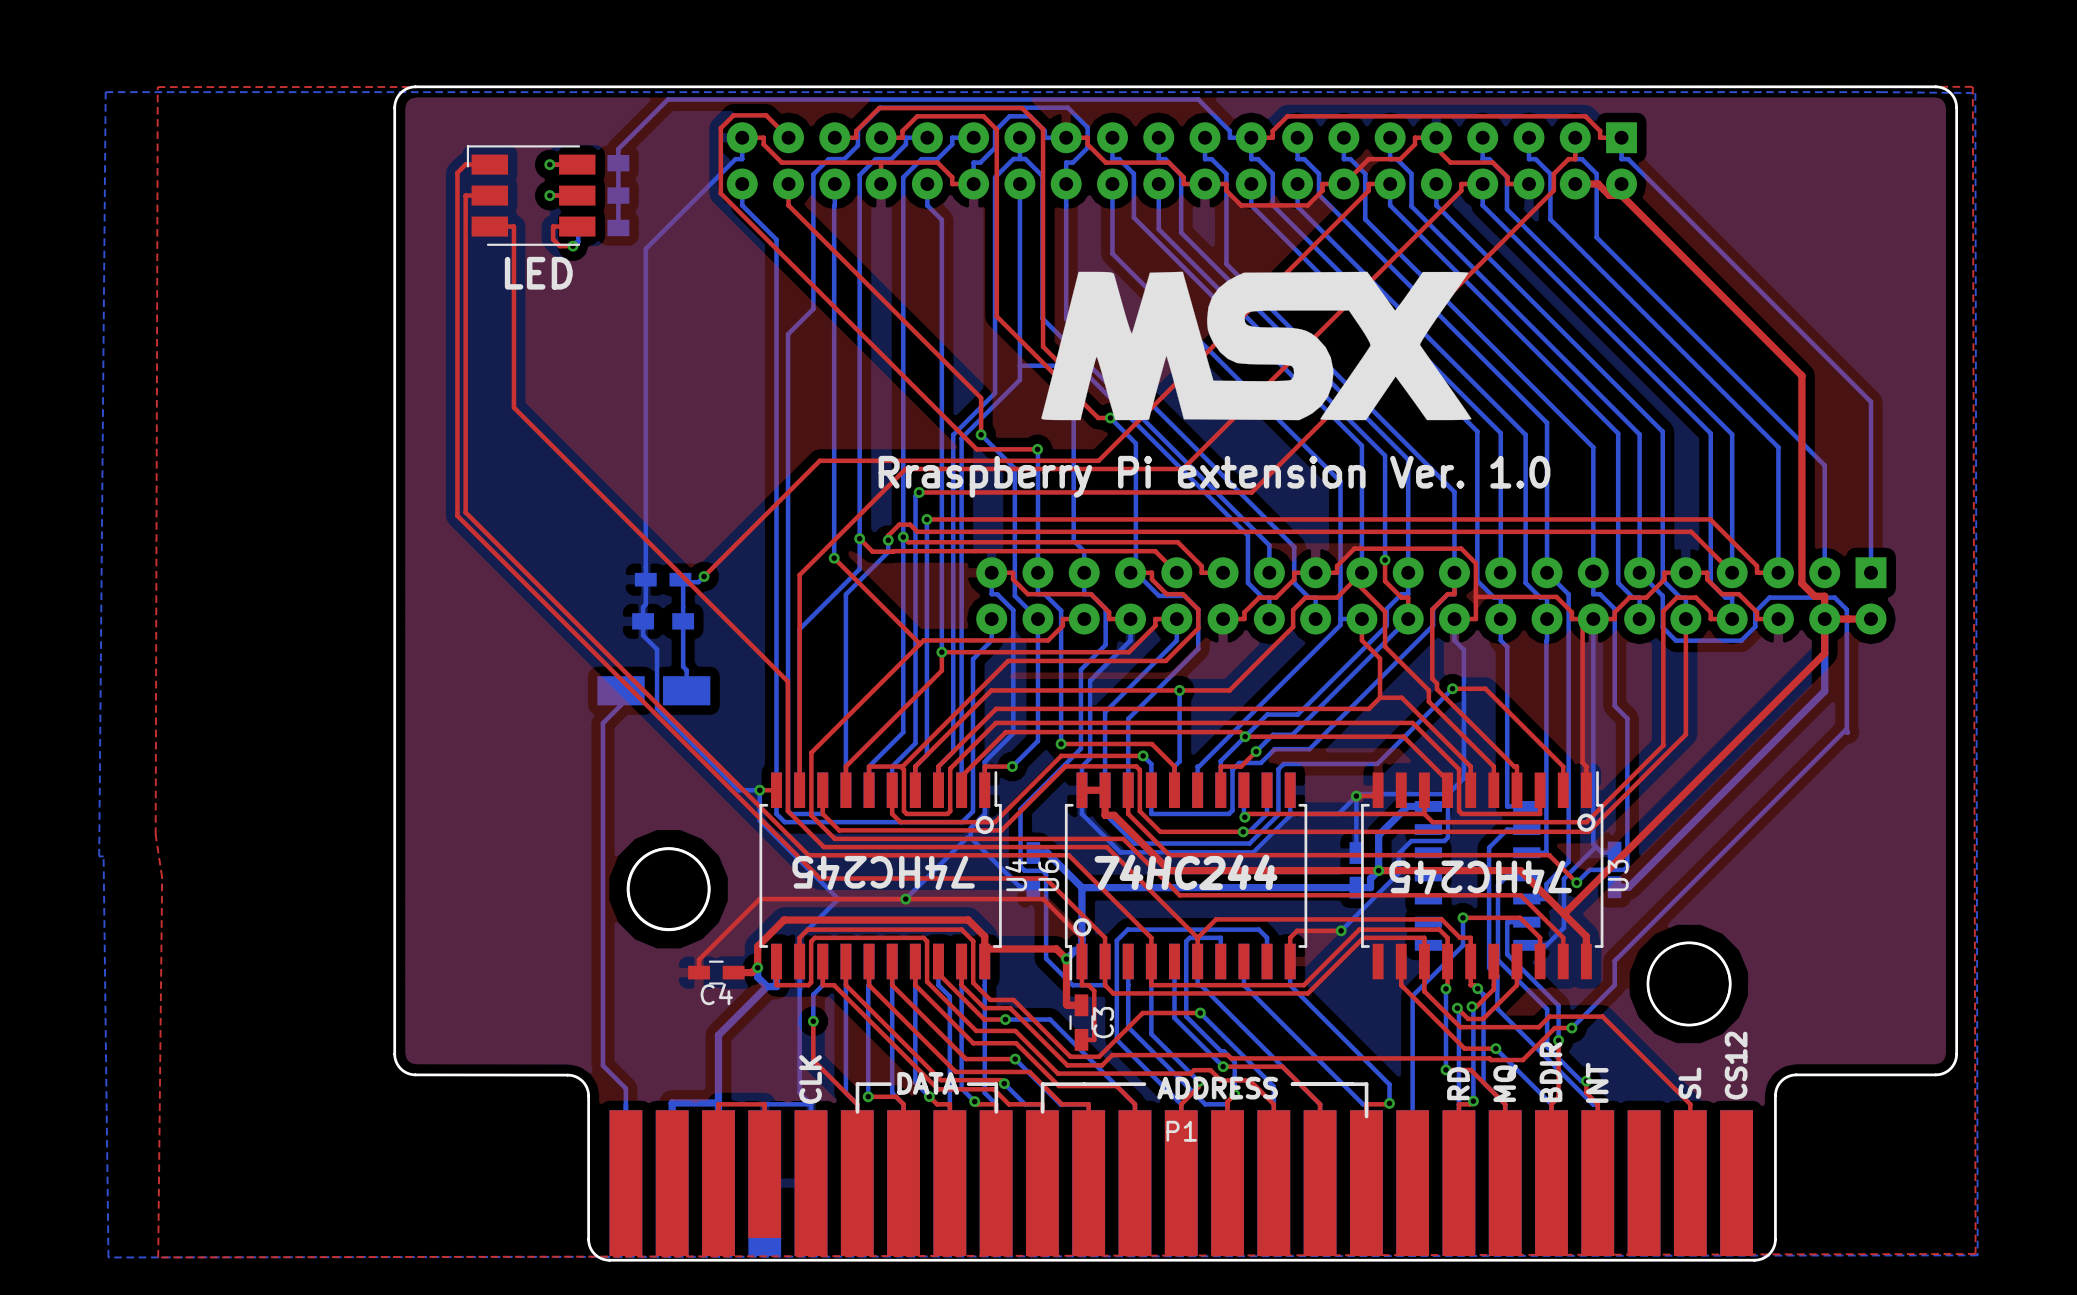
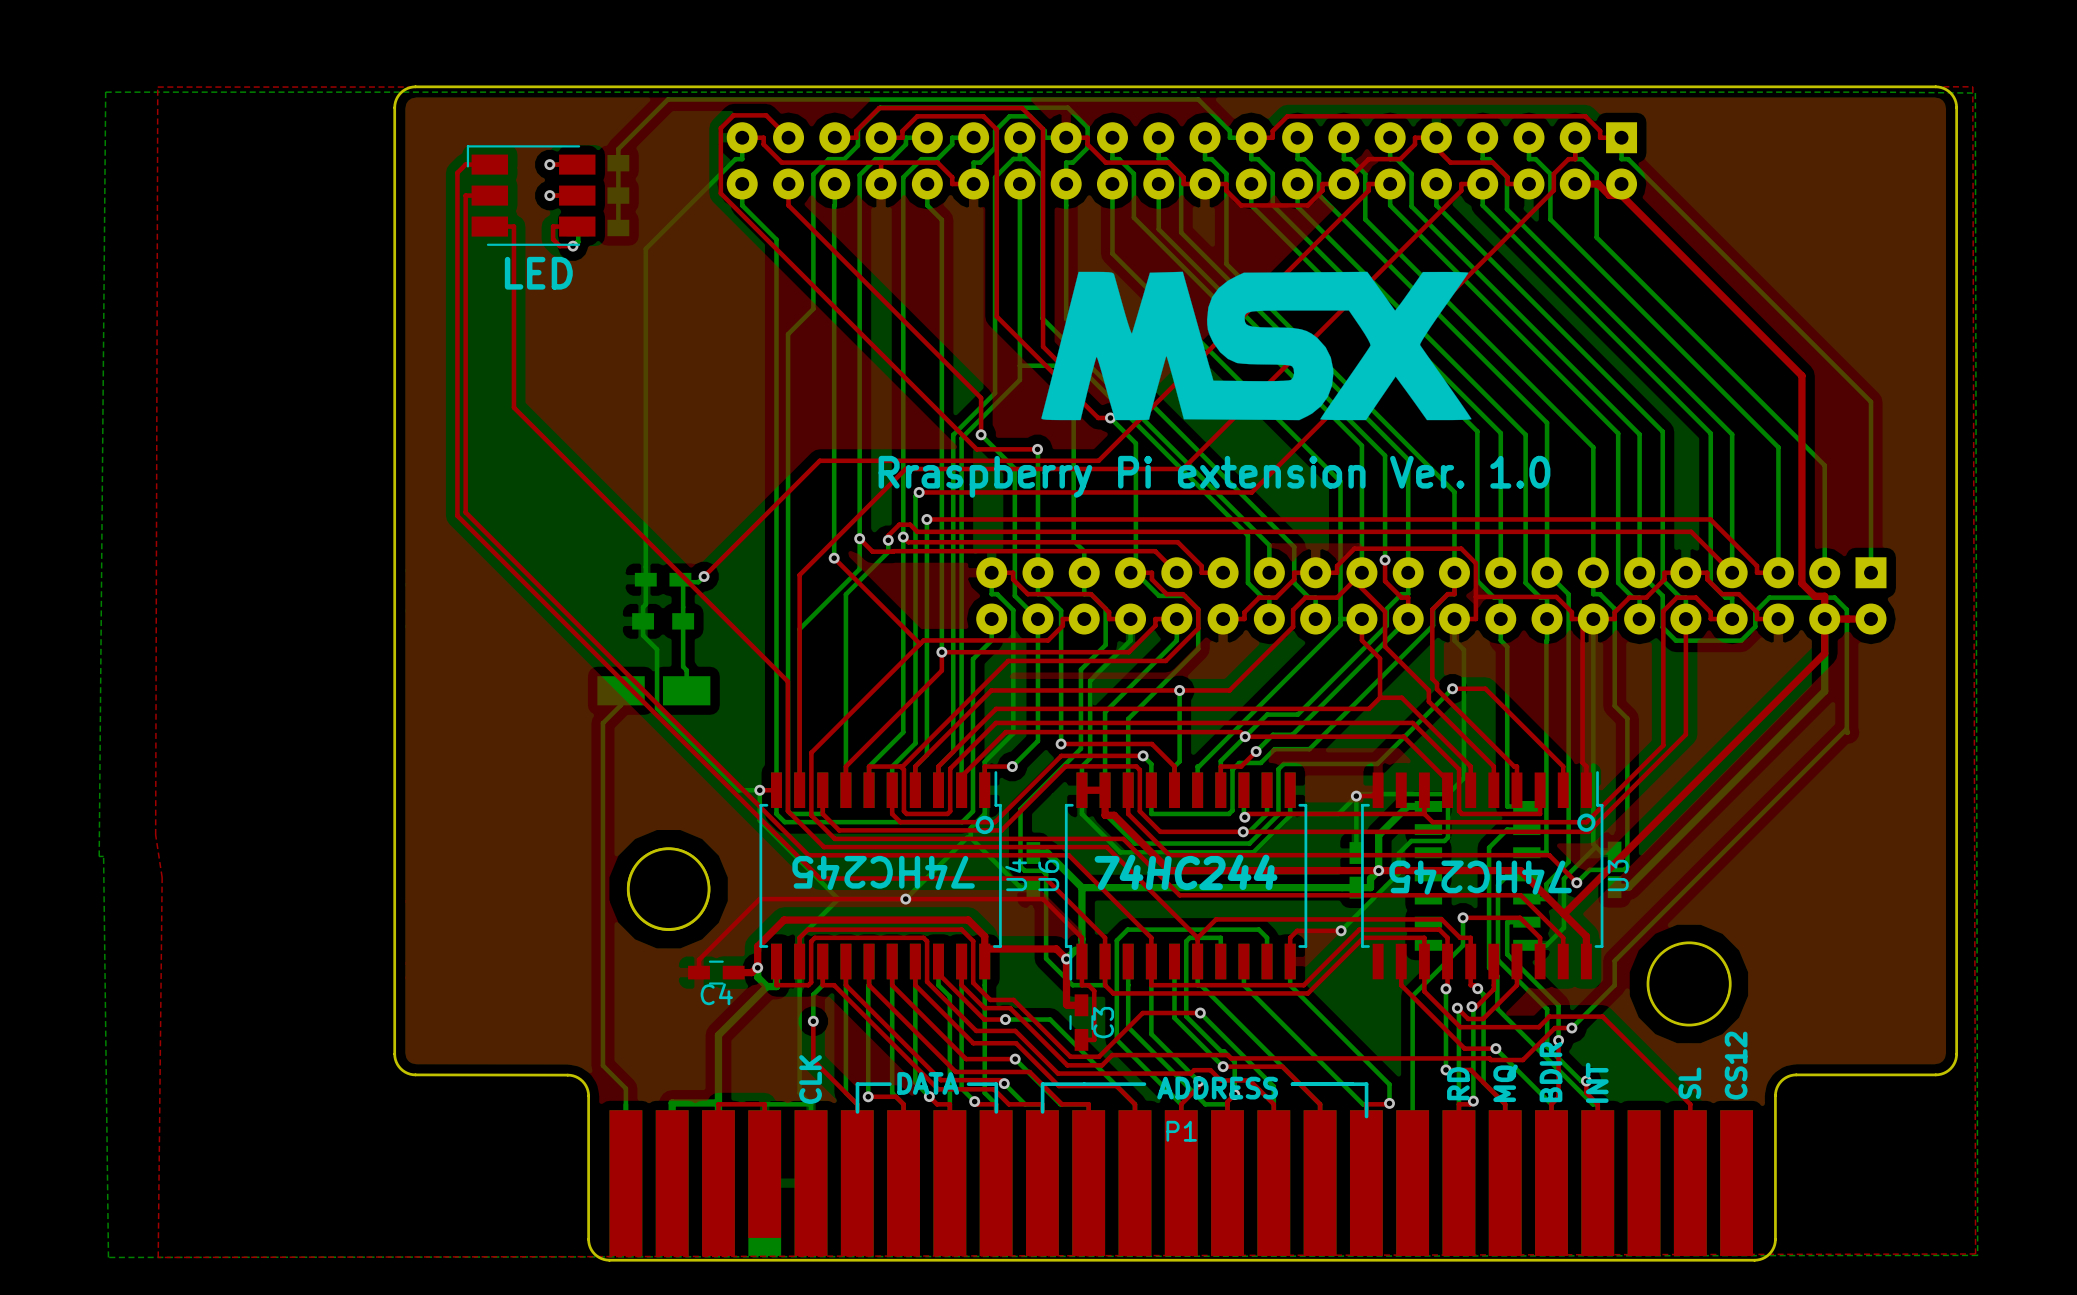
drawing: [1073, 918, 1092, 937] -> none

